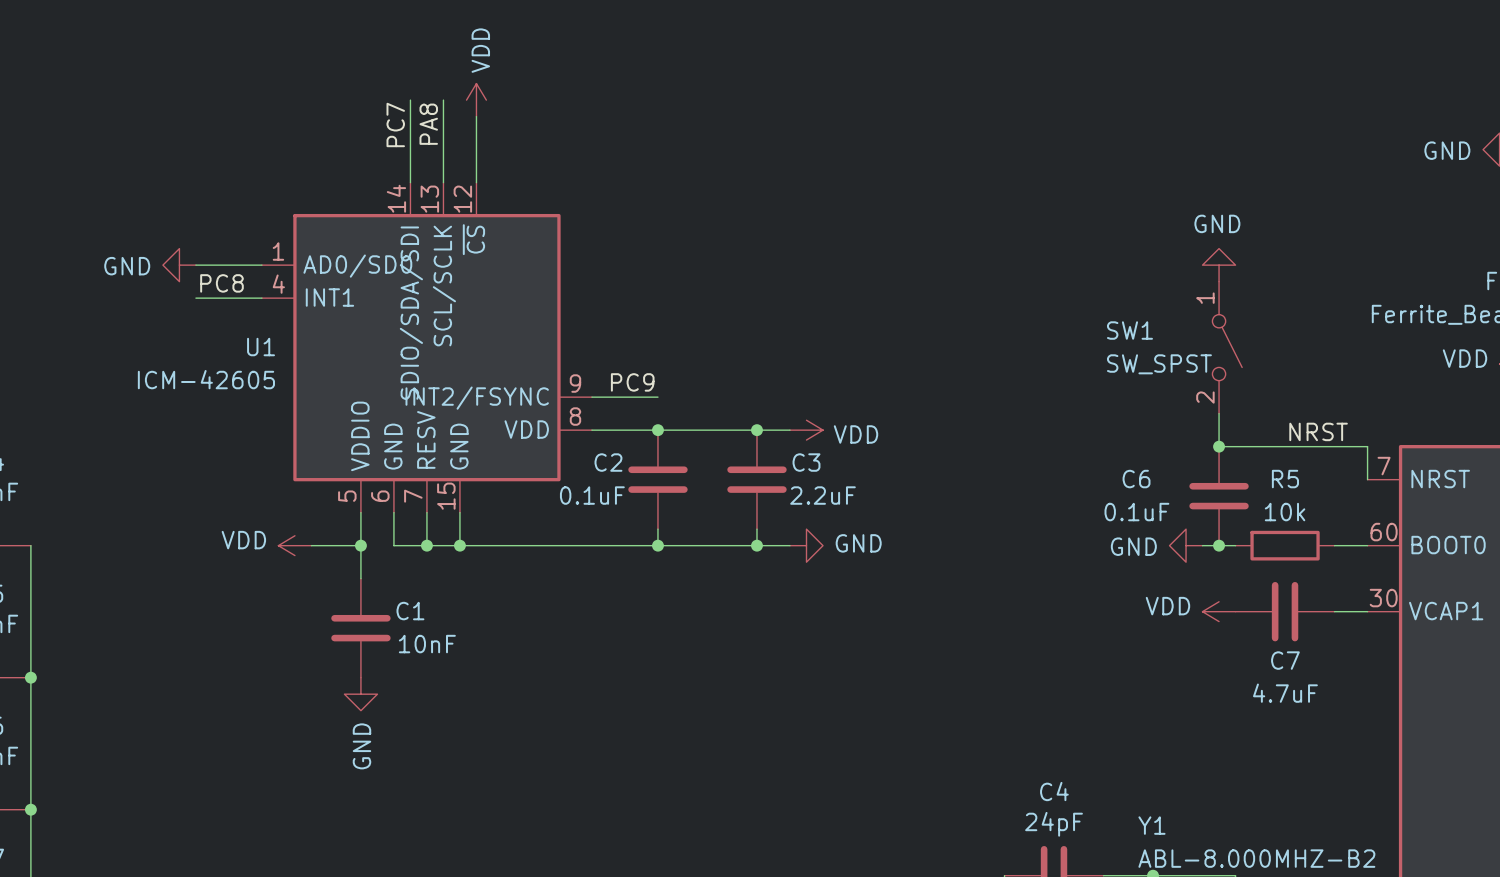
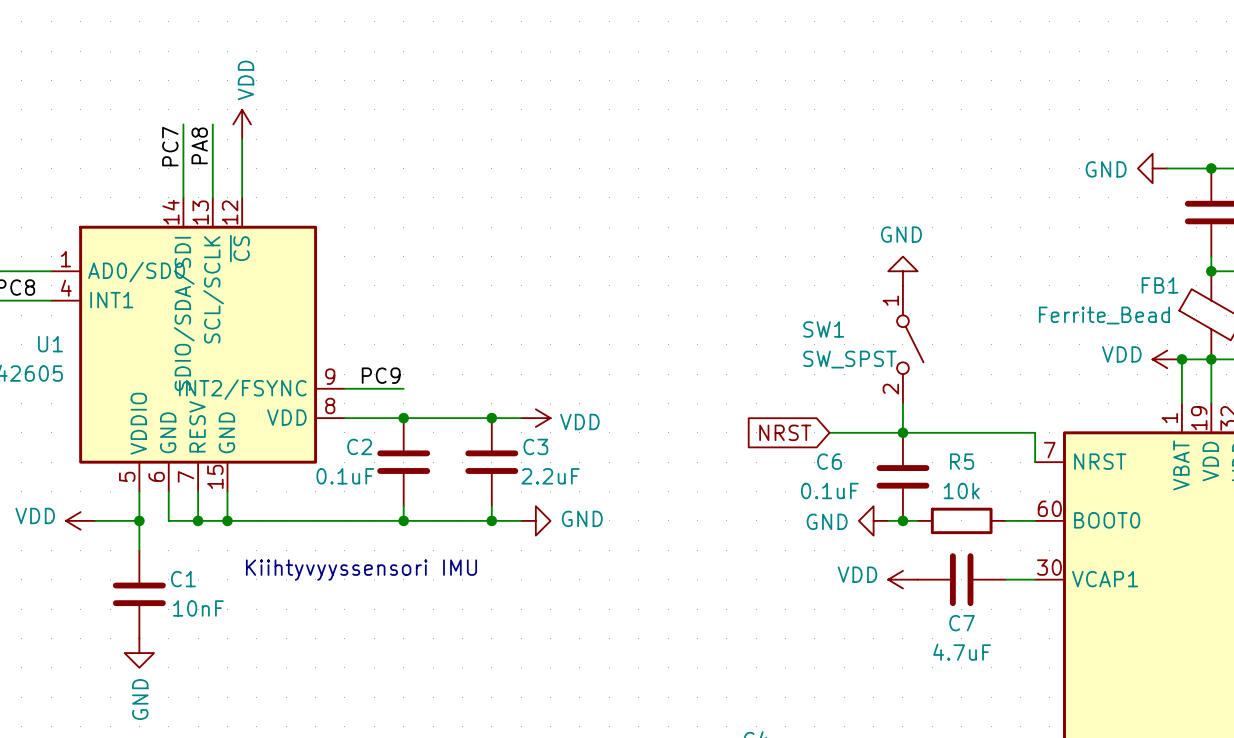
label: NRST (1318, 431) -> none
global label: none -> NRST (785, 432)
wire: none -> (829, 432) (902, 432)
text: none -> Kiihtyvyyssensori IMU (361, 570)

